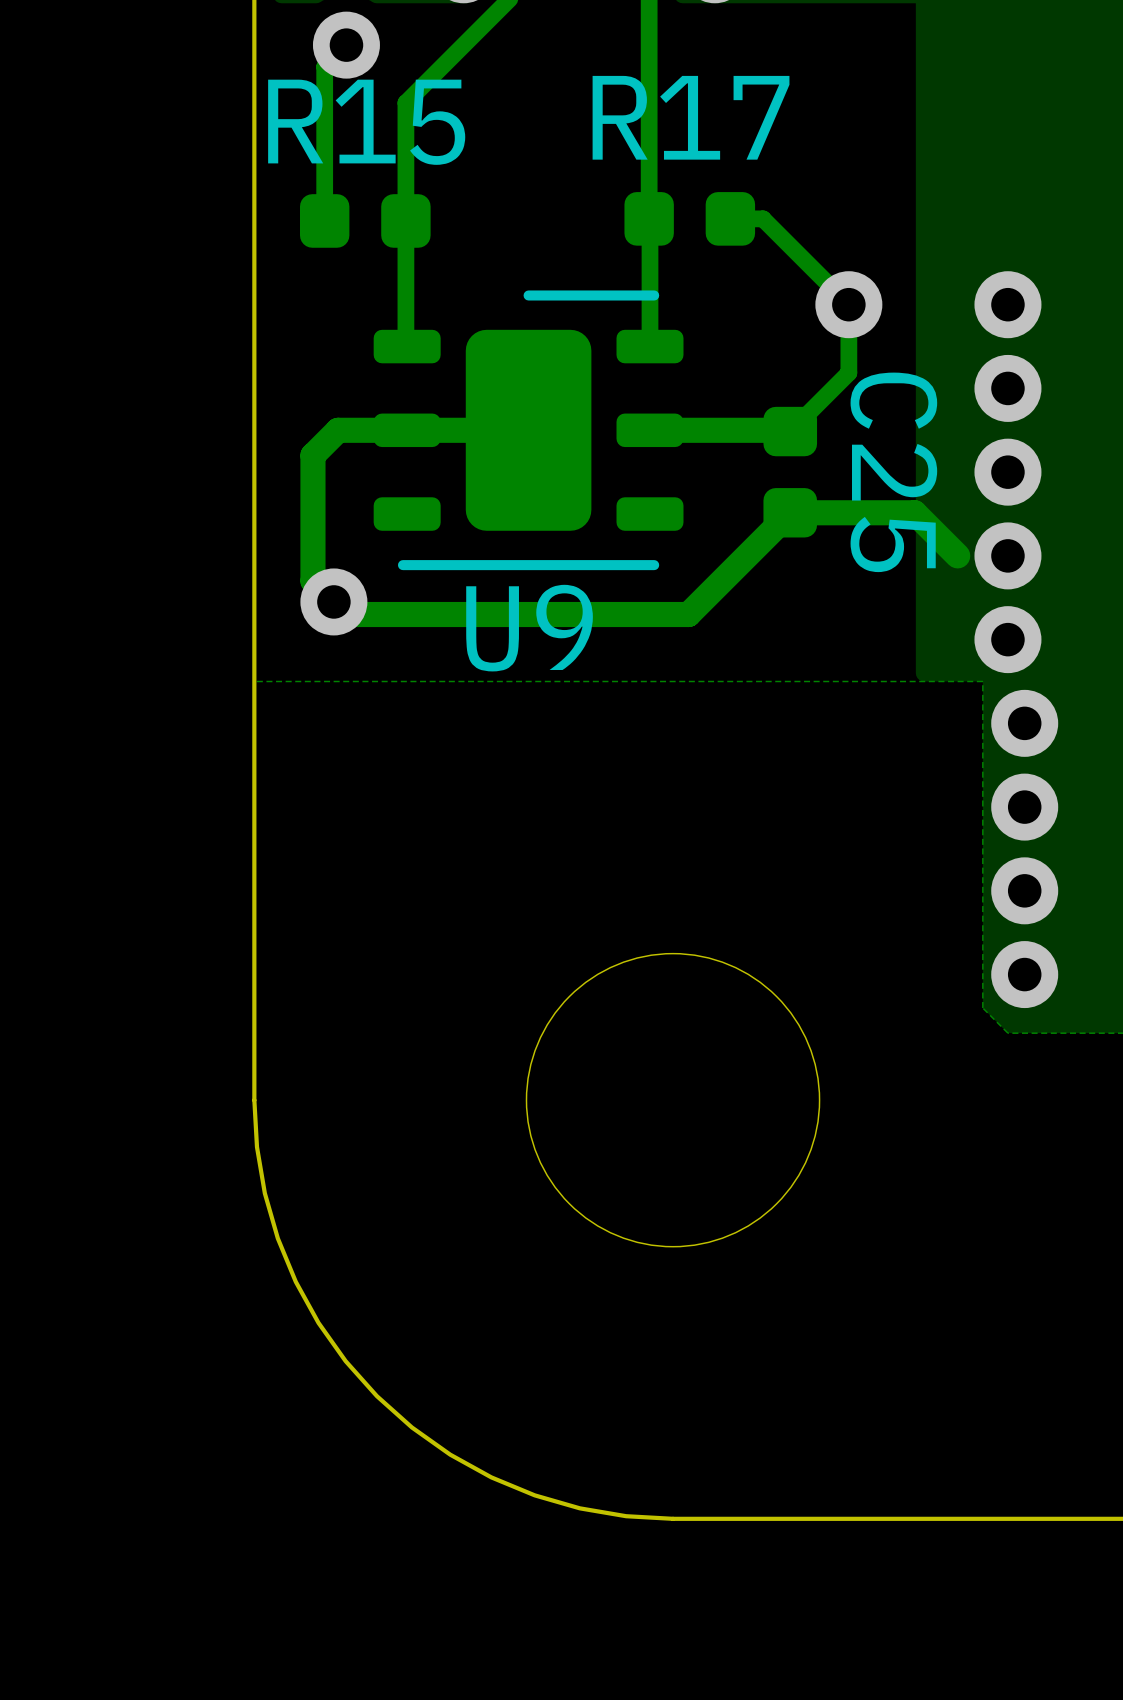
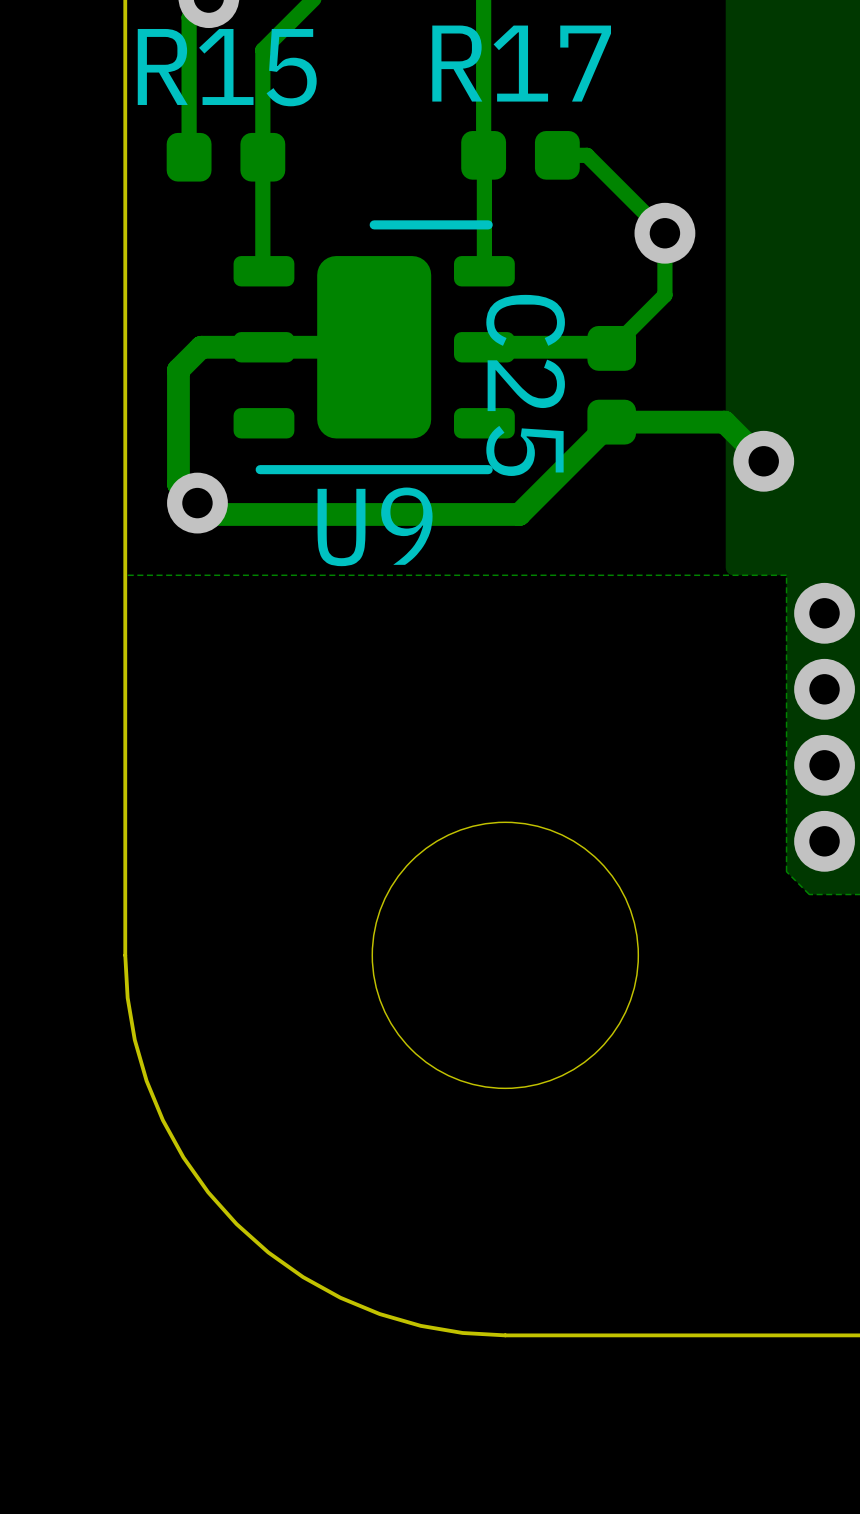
via: (1007, 304) -> none
via: (1007, 388) -> none
C25 name position: C25 (893, 472) -> C25 (525, 385)
via: (1007, 472) -> none
via position: (1007, 555) -> (763, 461)
via: (1007, 639) -> none

